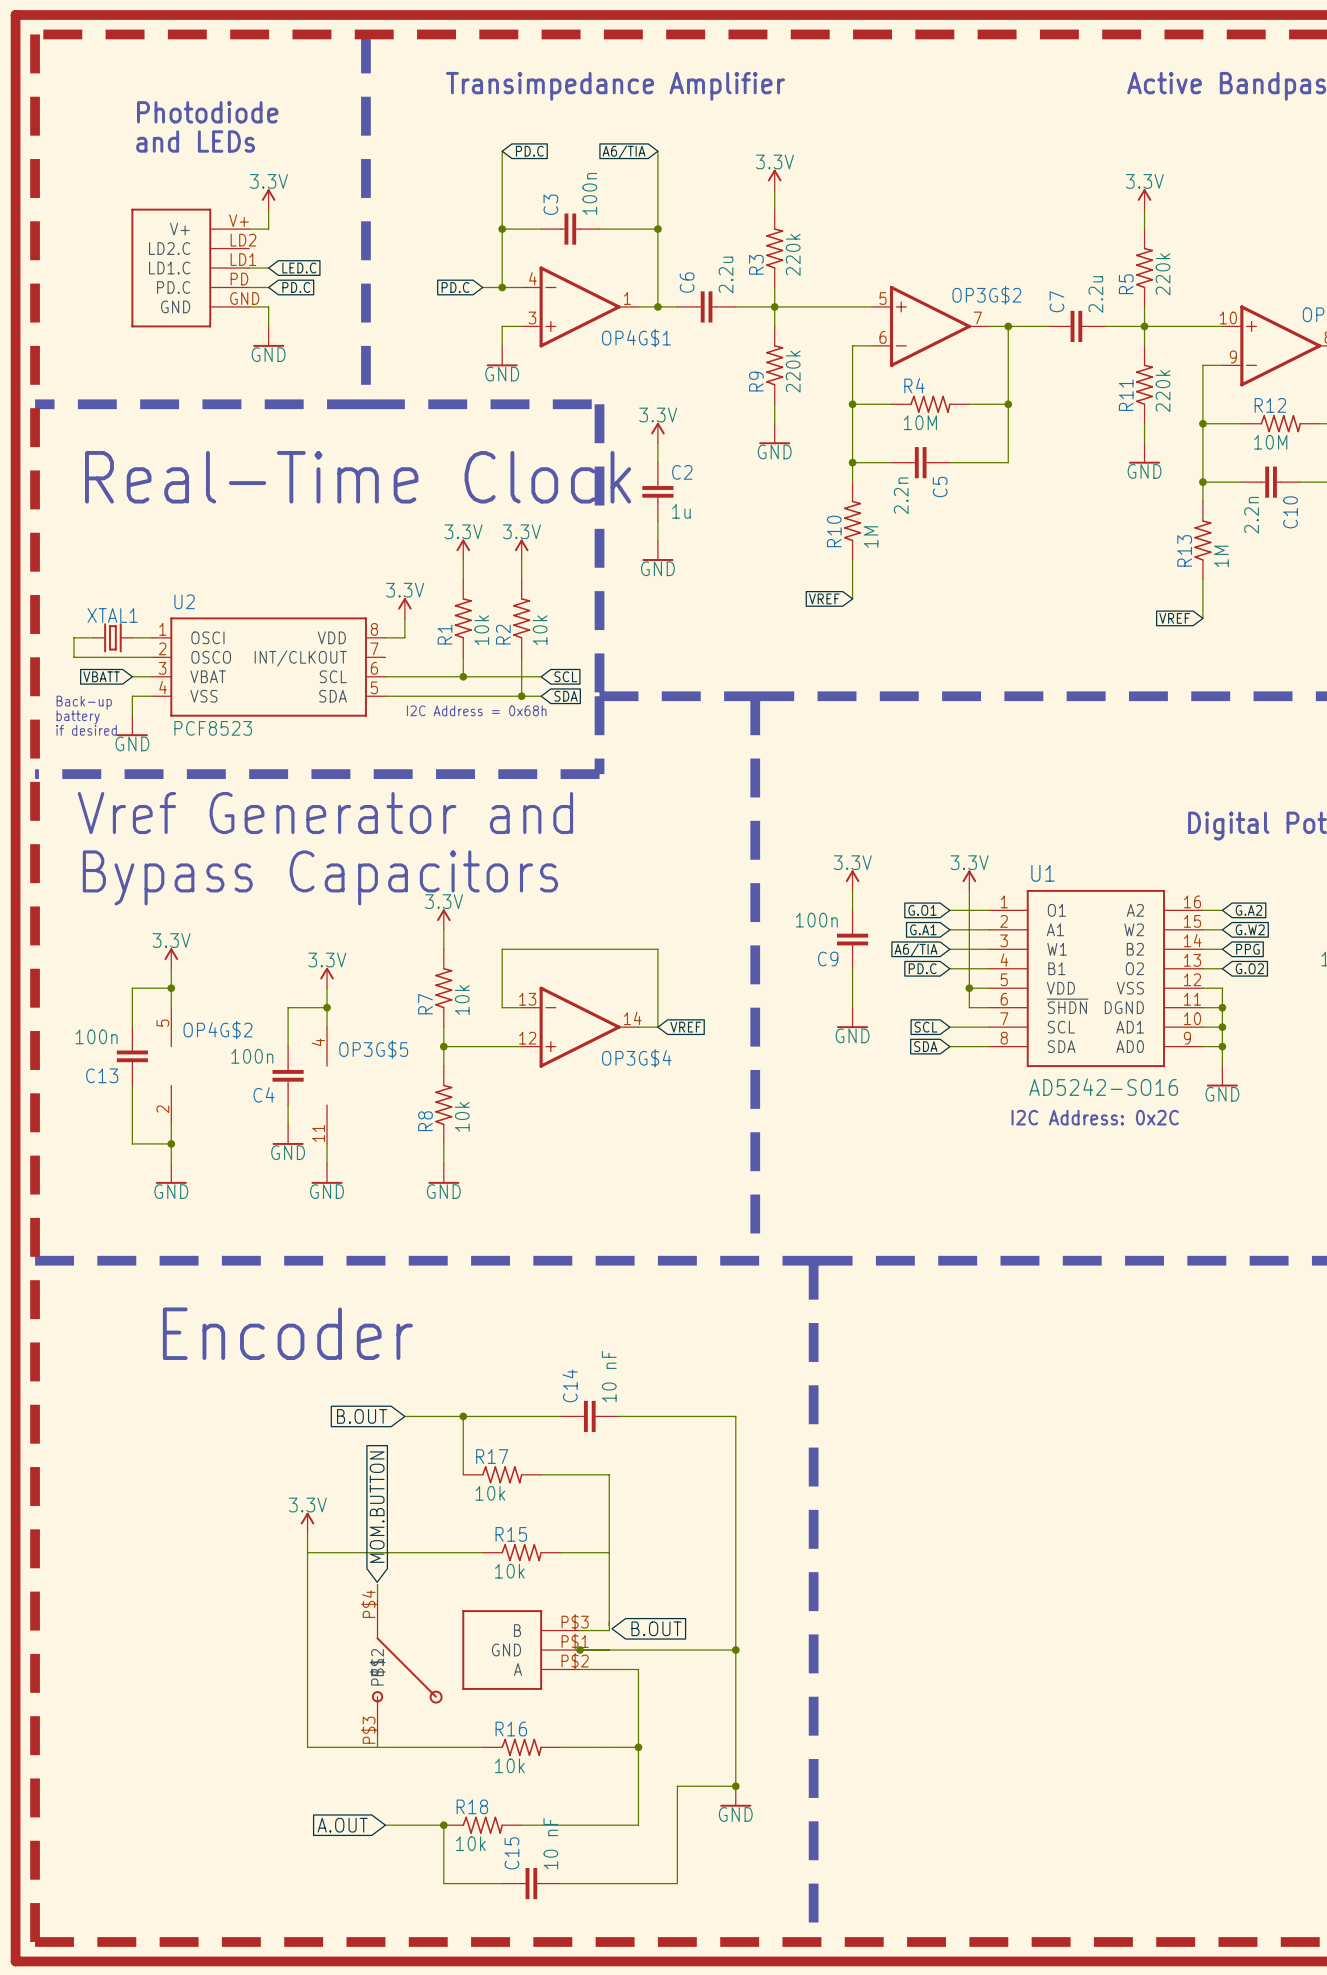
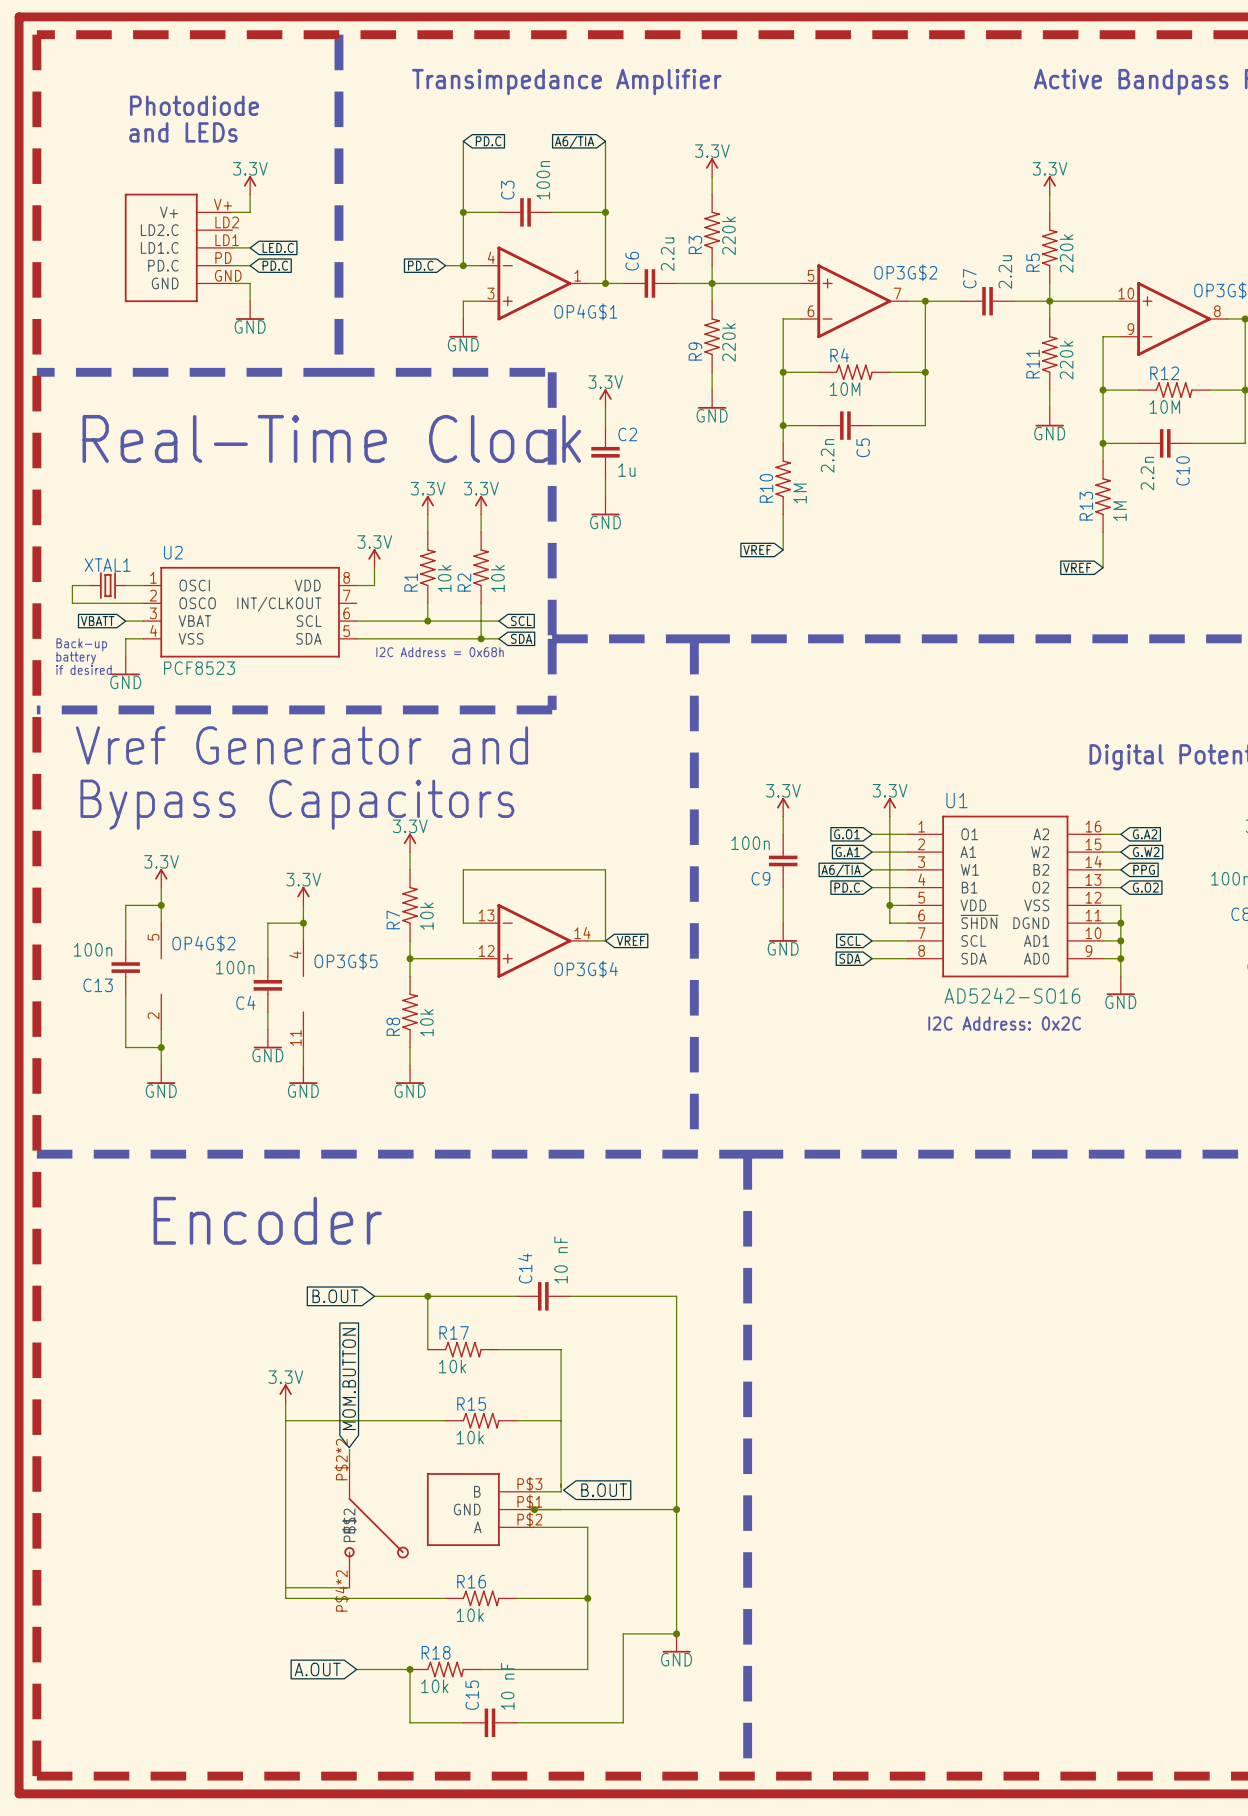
part pin number: P$4 (369, 1604) -> P$2*2 (341, 1459)
part pin number: P$3 (369, 1730) -> P$4*2 (341, 1590)
wire: (377, 1735) (377, 1747) -> (349, 1587) (285, 1587)

